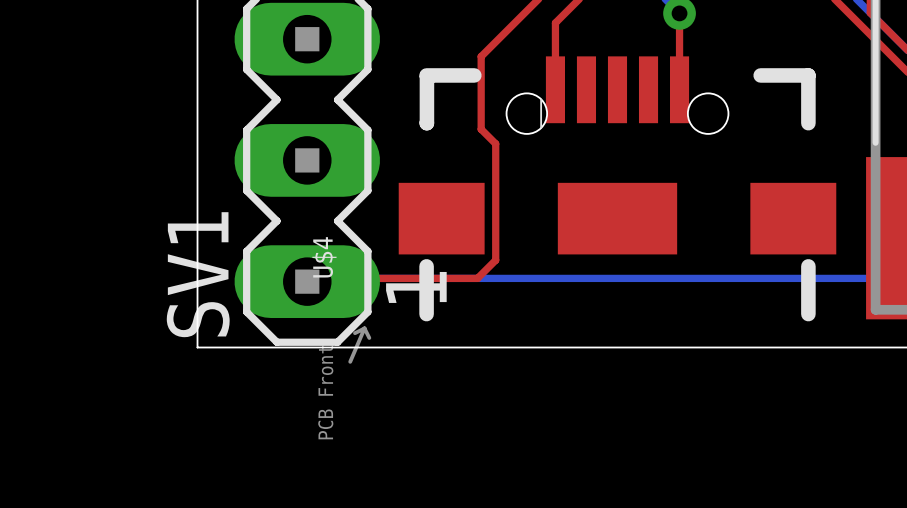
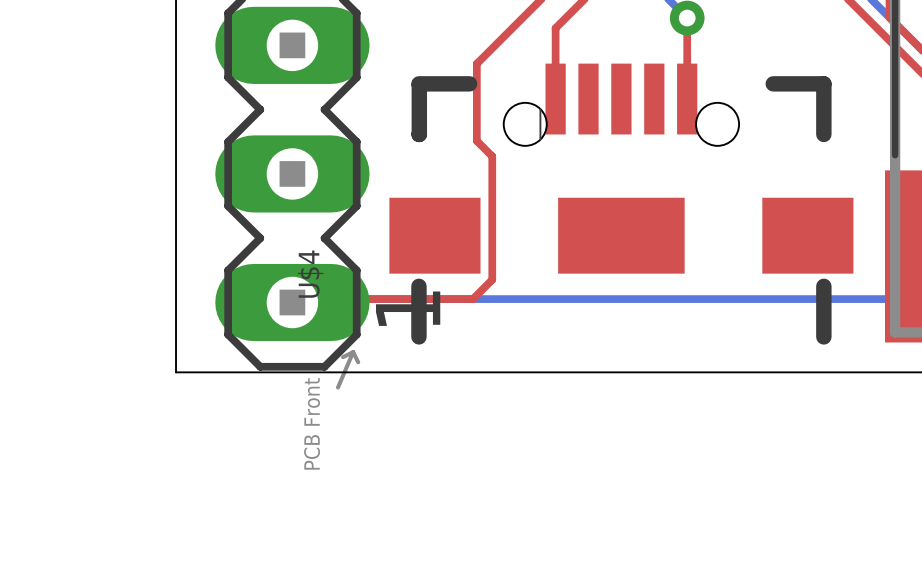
SV1 name: SV1 (198, 274) -> none

